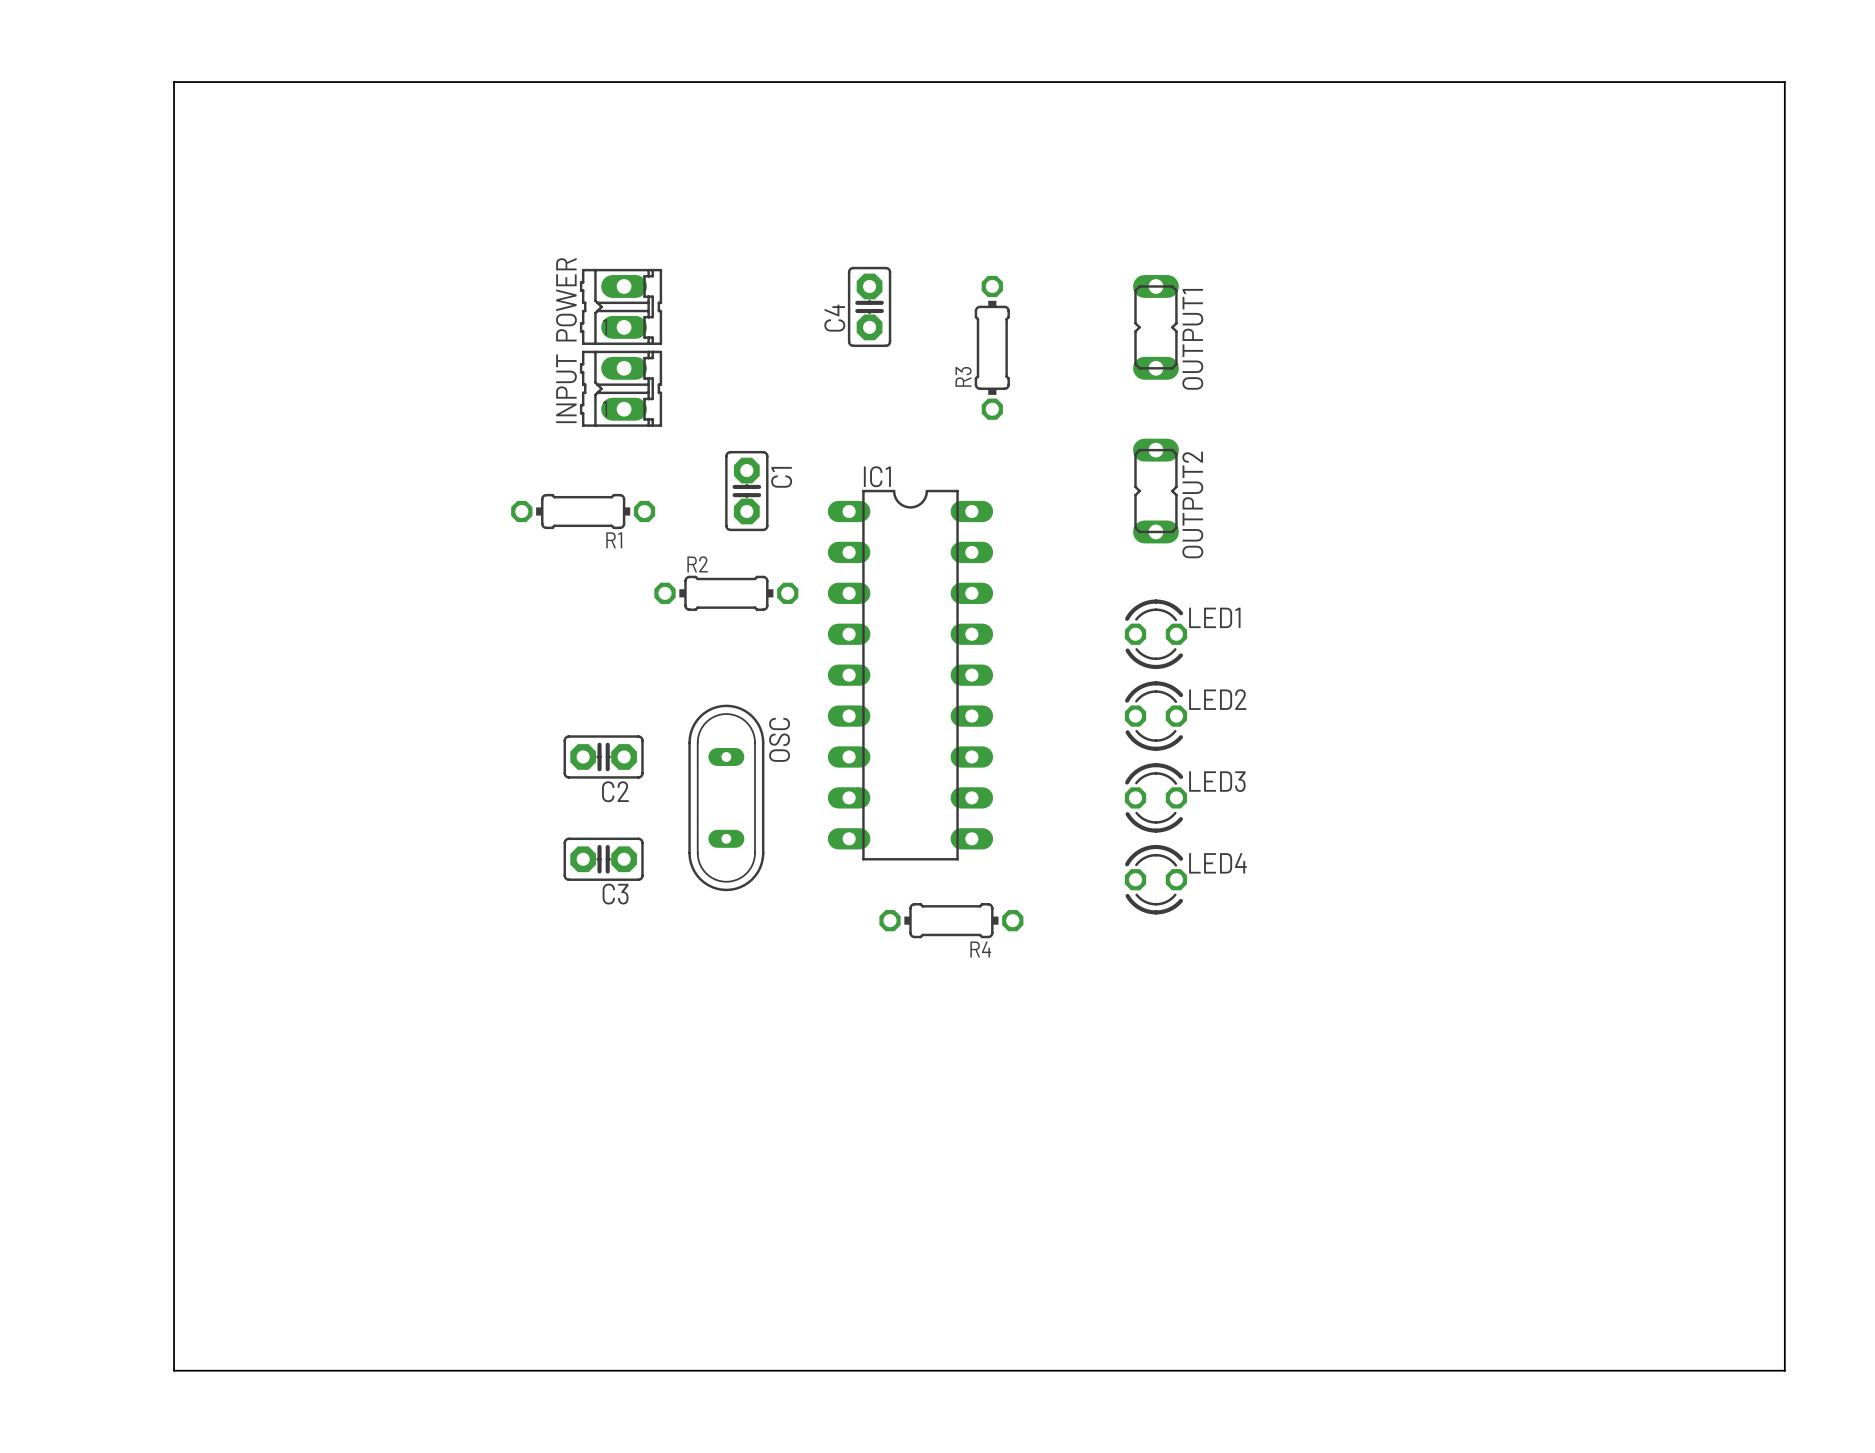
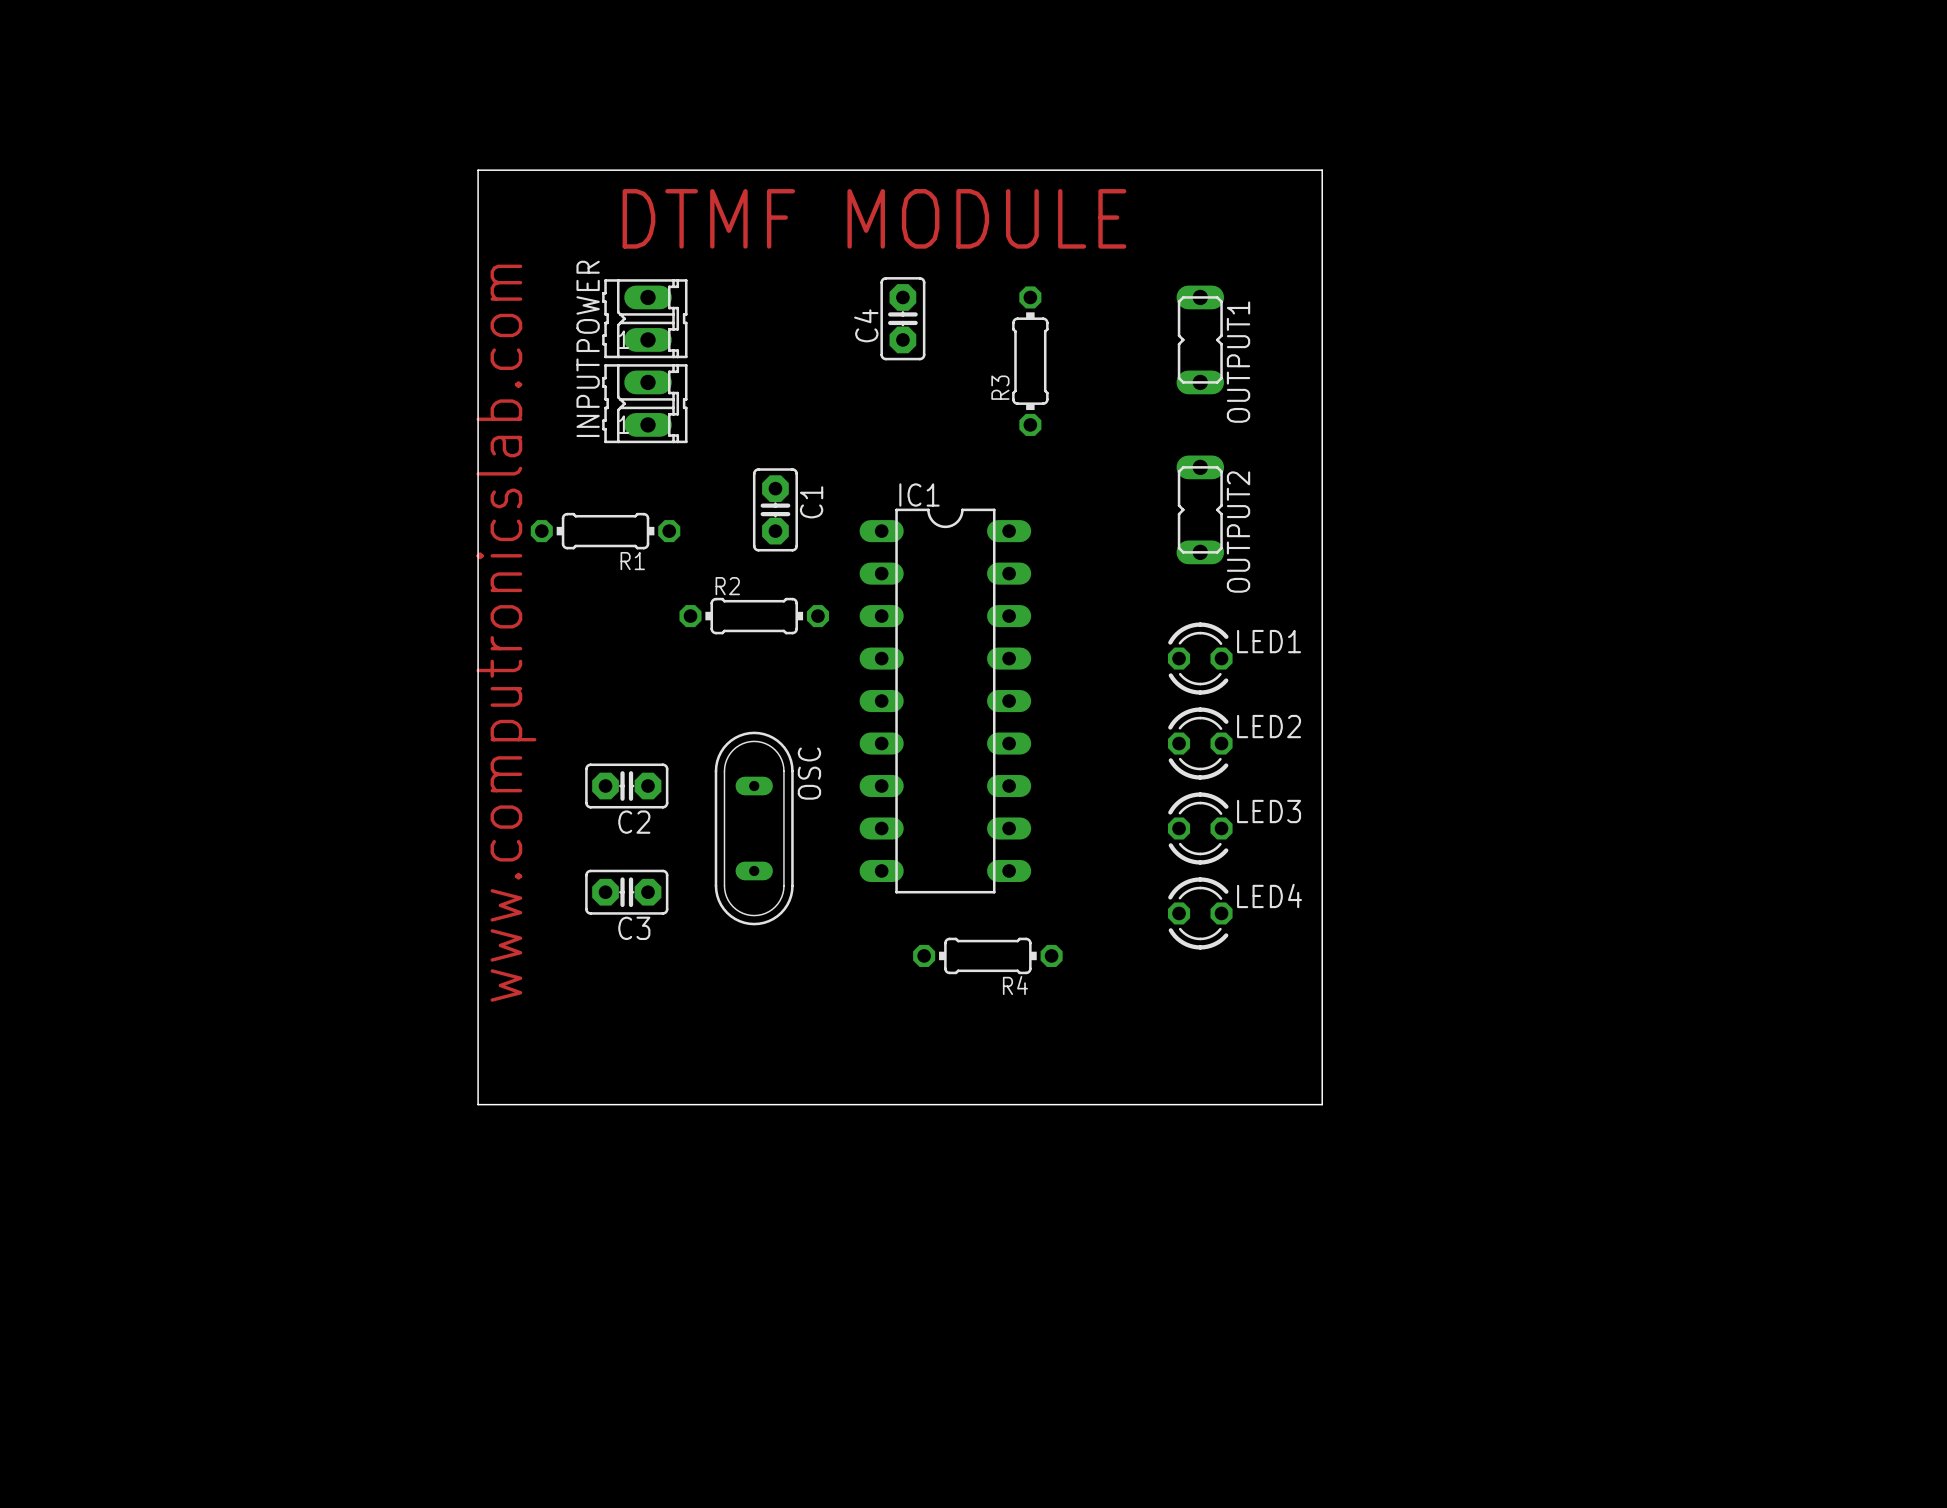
board edge: (174, 82) (1784, 82) (1784, 1370) (174, 1370) (174, 82) -> none
board edge: none -> (478, 170) (1322, 170) (1322, 1104) (478, 1104) (478, 170)
text: none -> DTMF MODULE (874, 218)
text: none -> www.computronicslab.com (506, 633)

